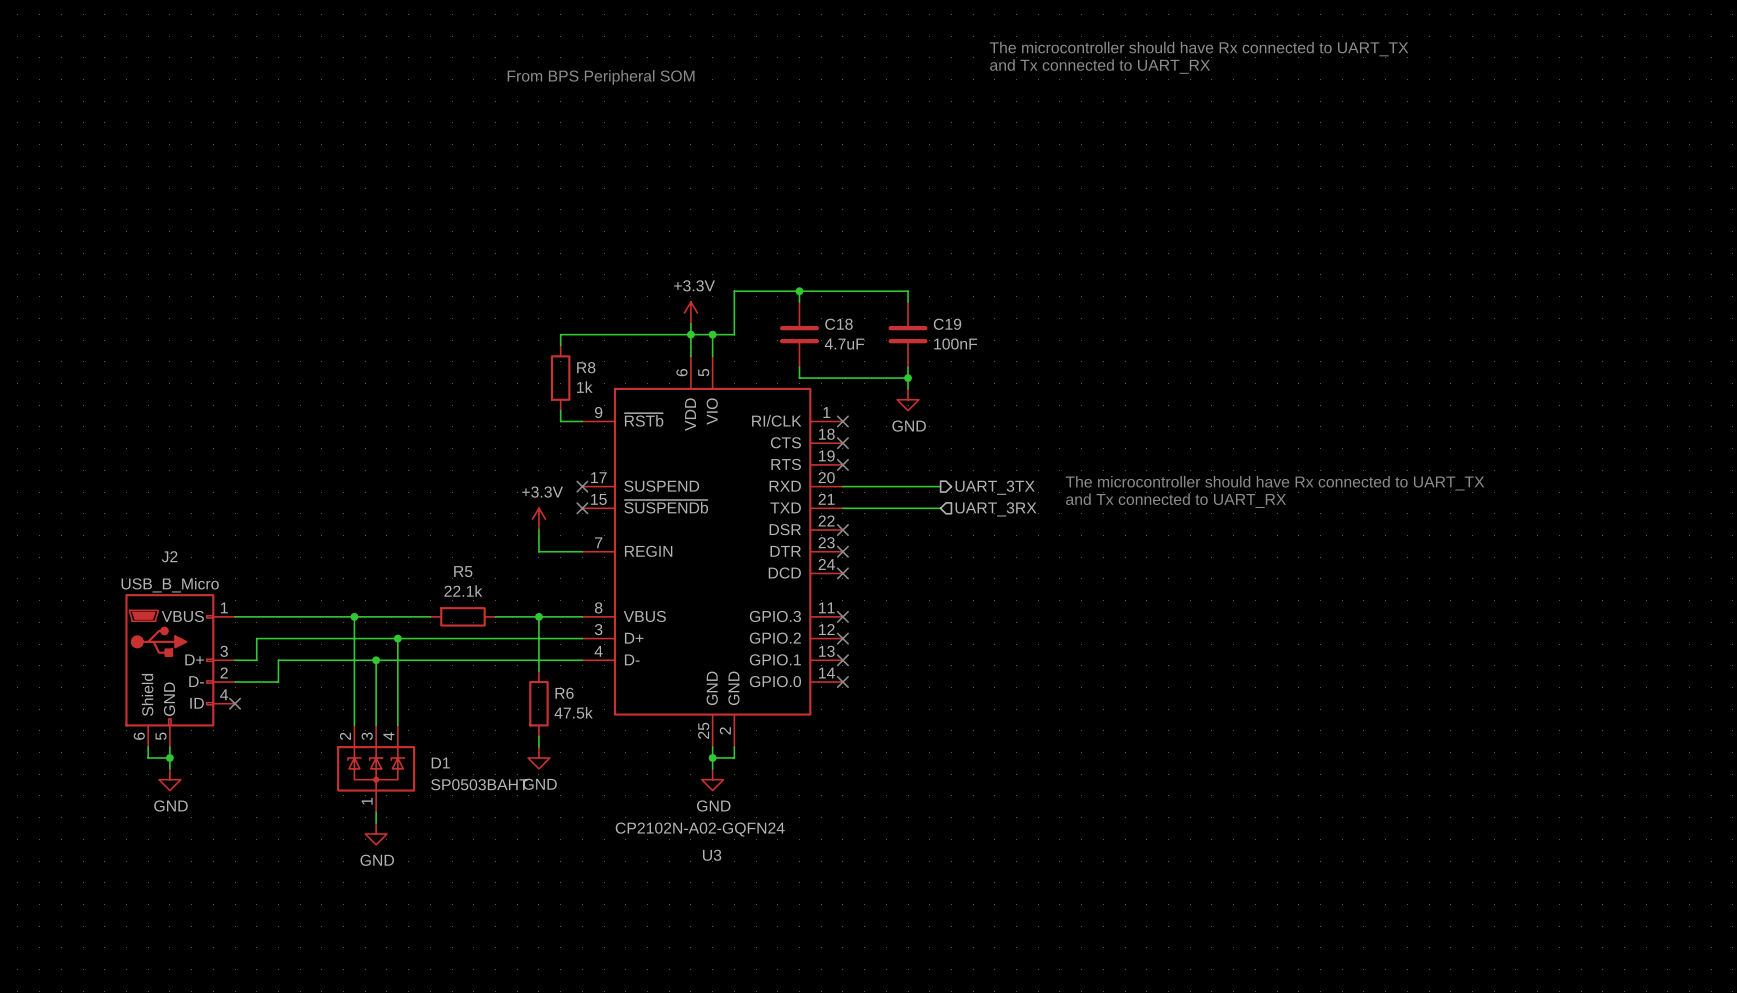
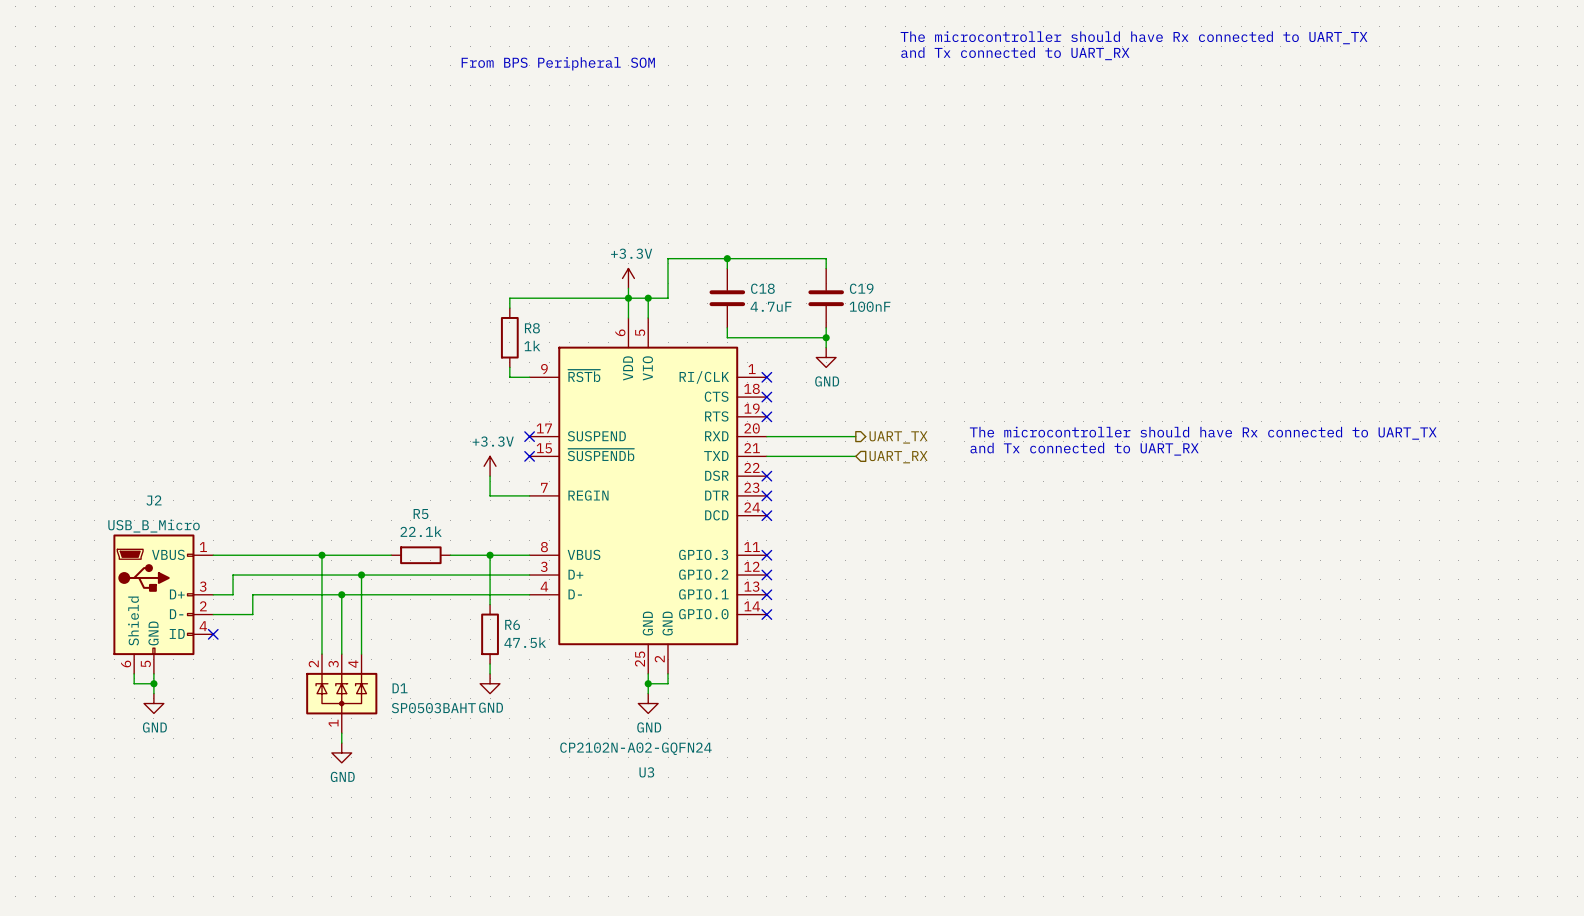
hierarchical label: UART_3TX (995, 487) -> UART_TX (898, 437)
hierarchical label: UART_3RX (996, 509) -> UART_RX (898, 457)

